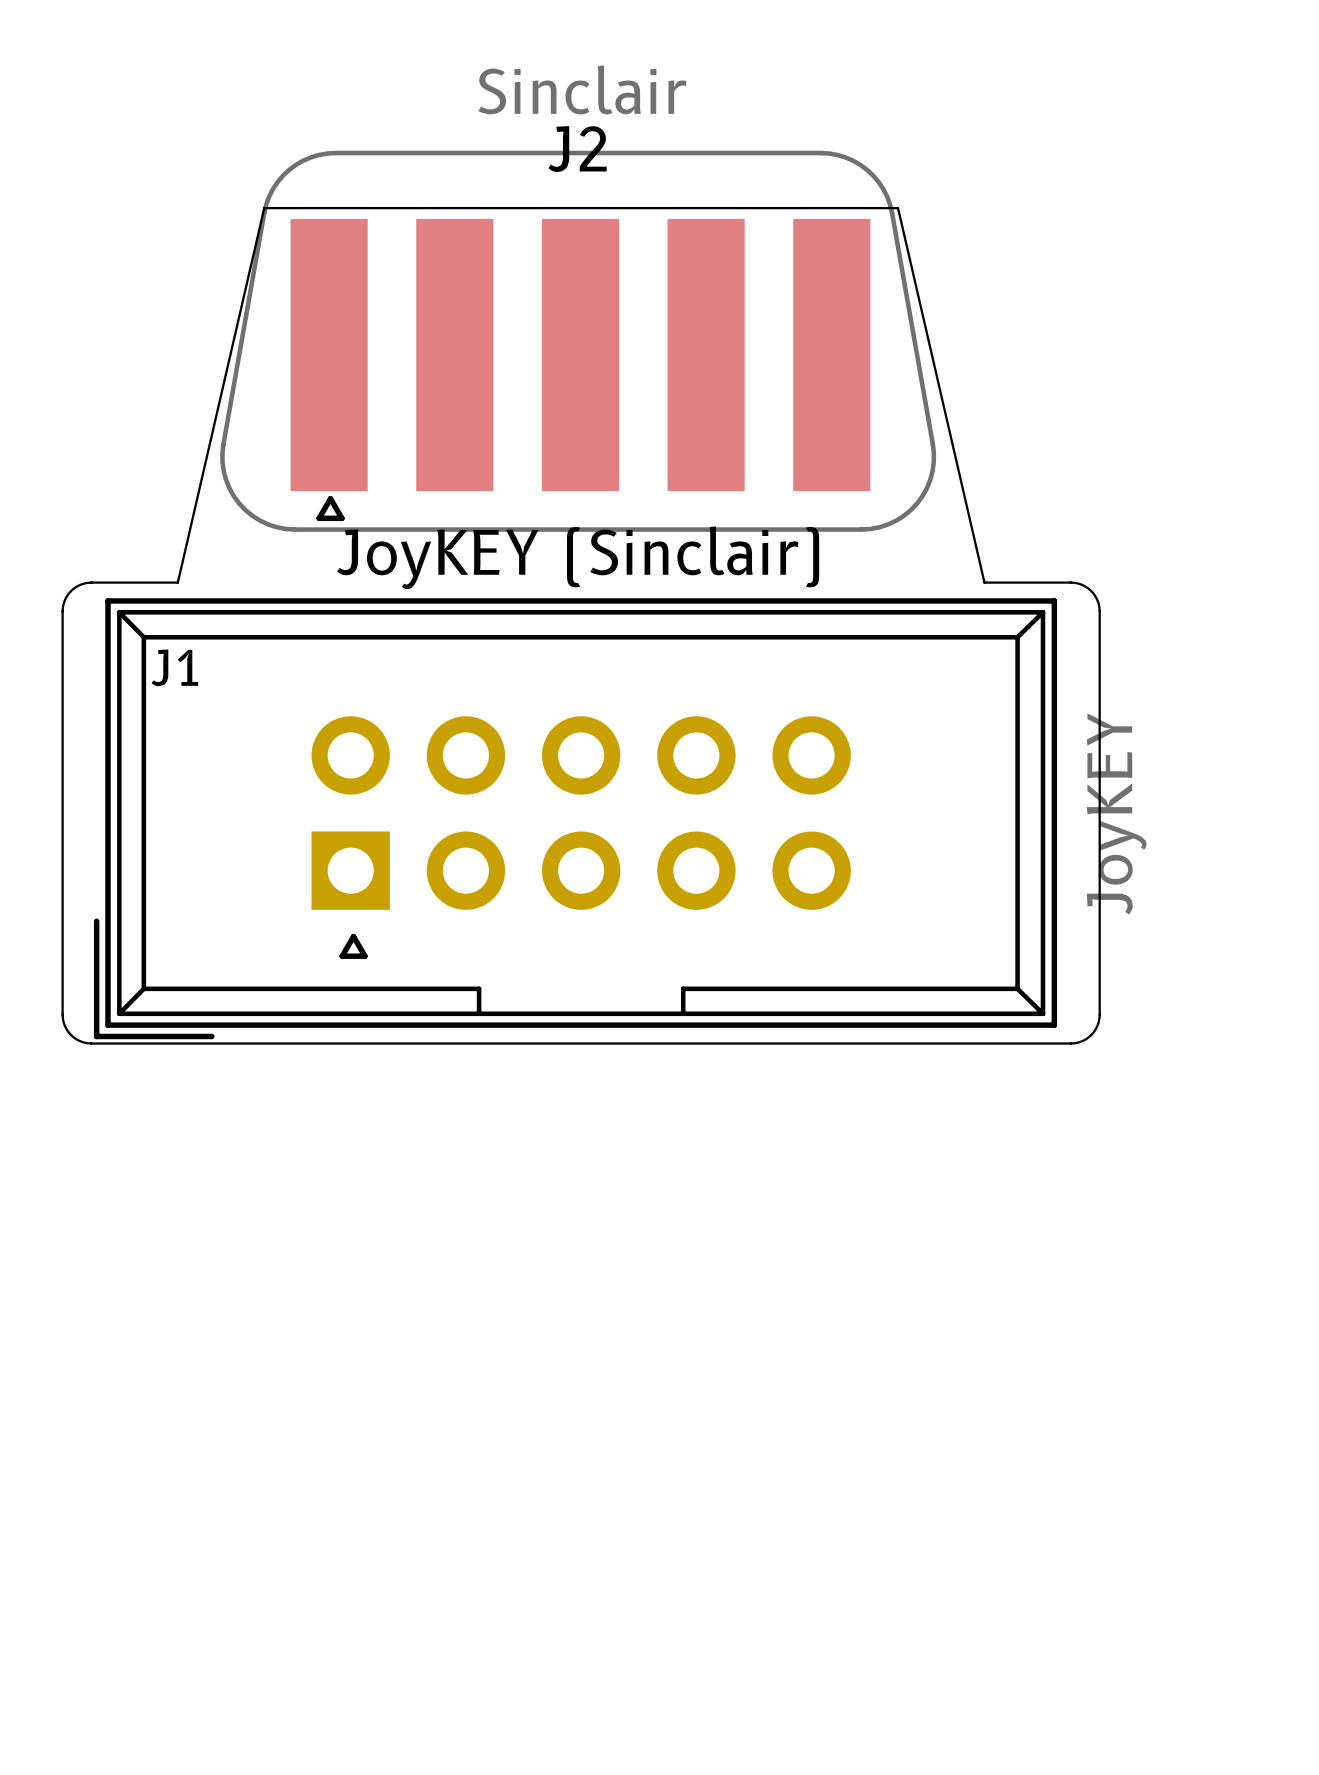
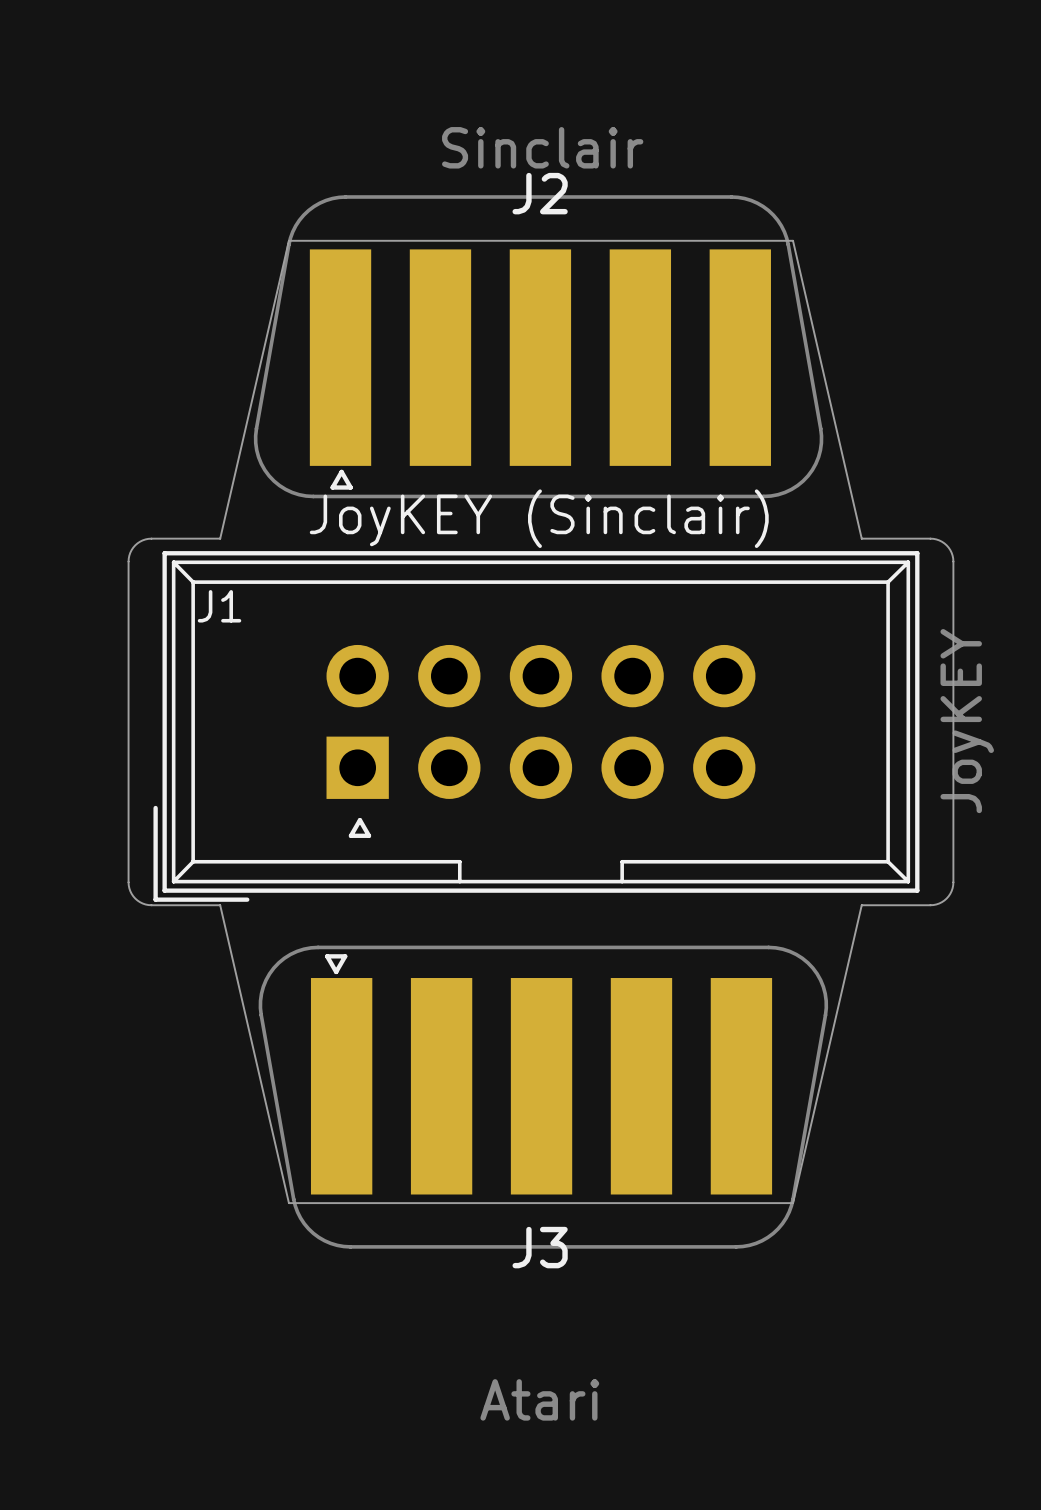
board edge: (177, 1043) (984, 1043) -> (220, 905) (288, 1203) (793, 1203) (861, 905)
J3: none -> Atari (543, 1097)

